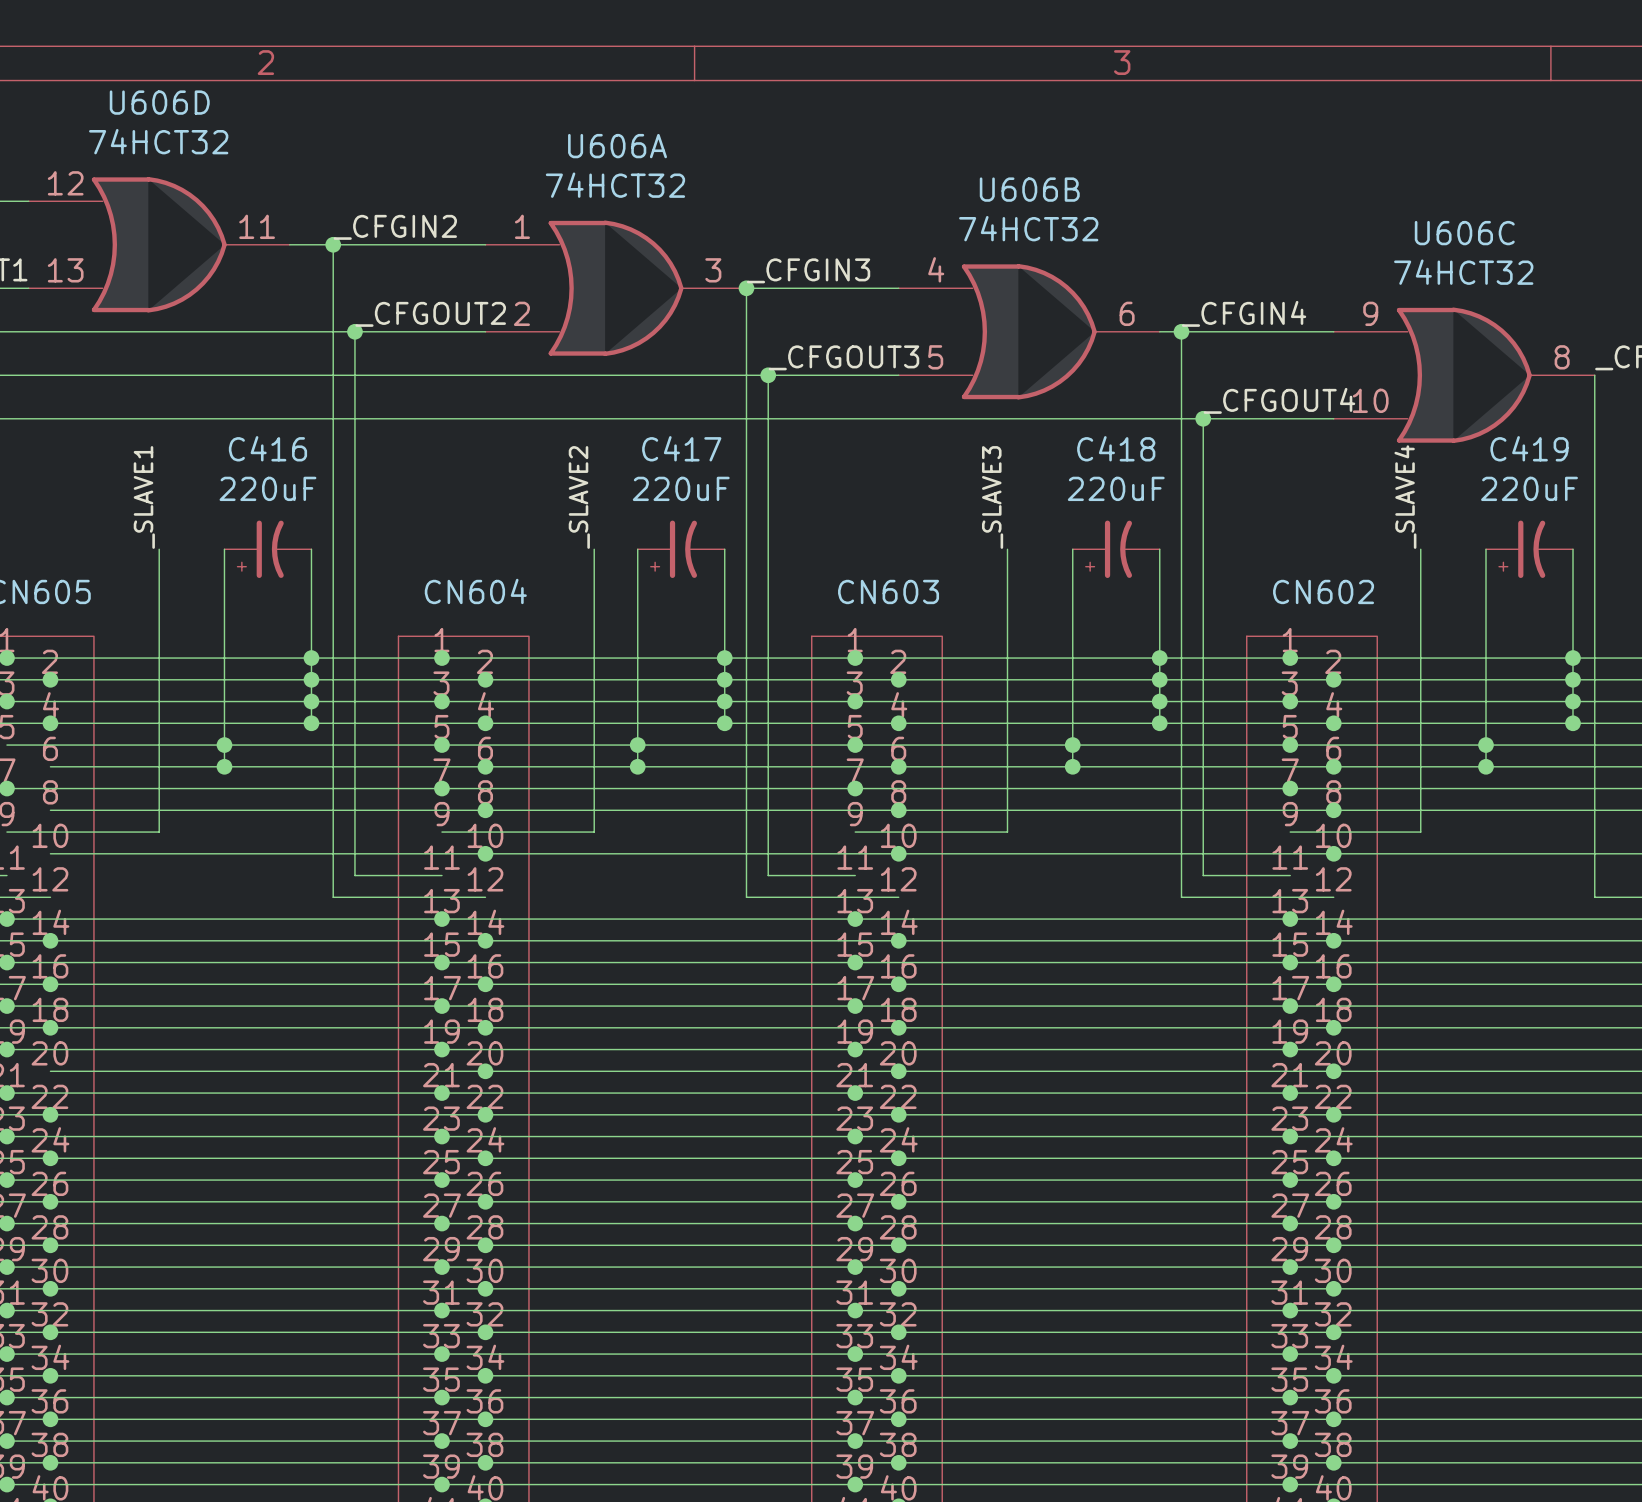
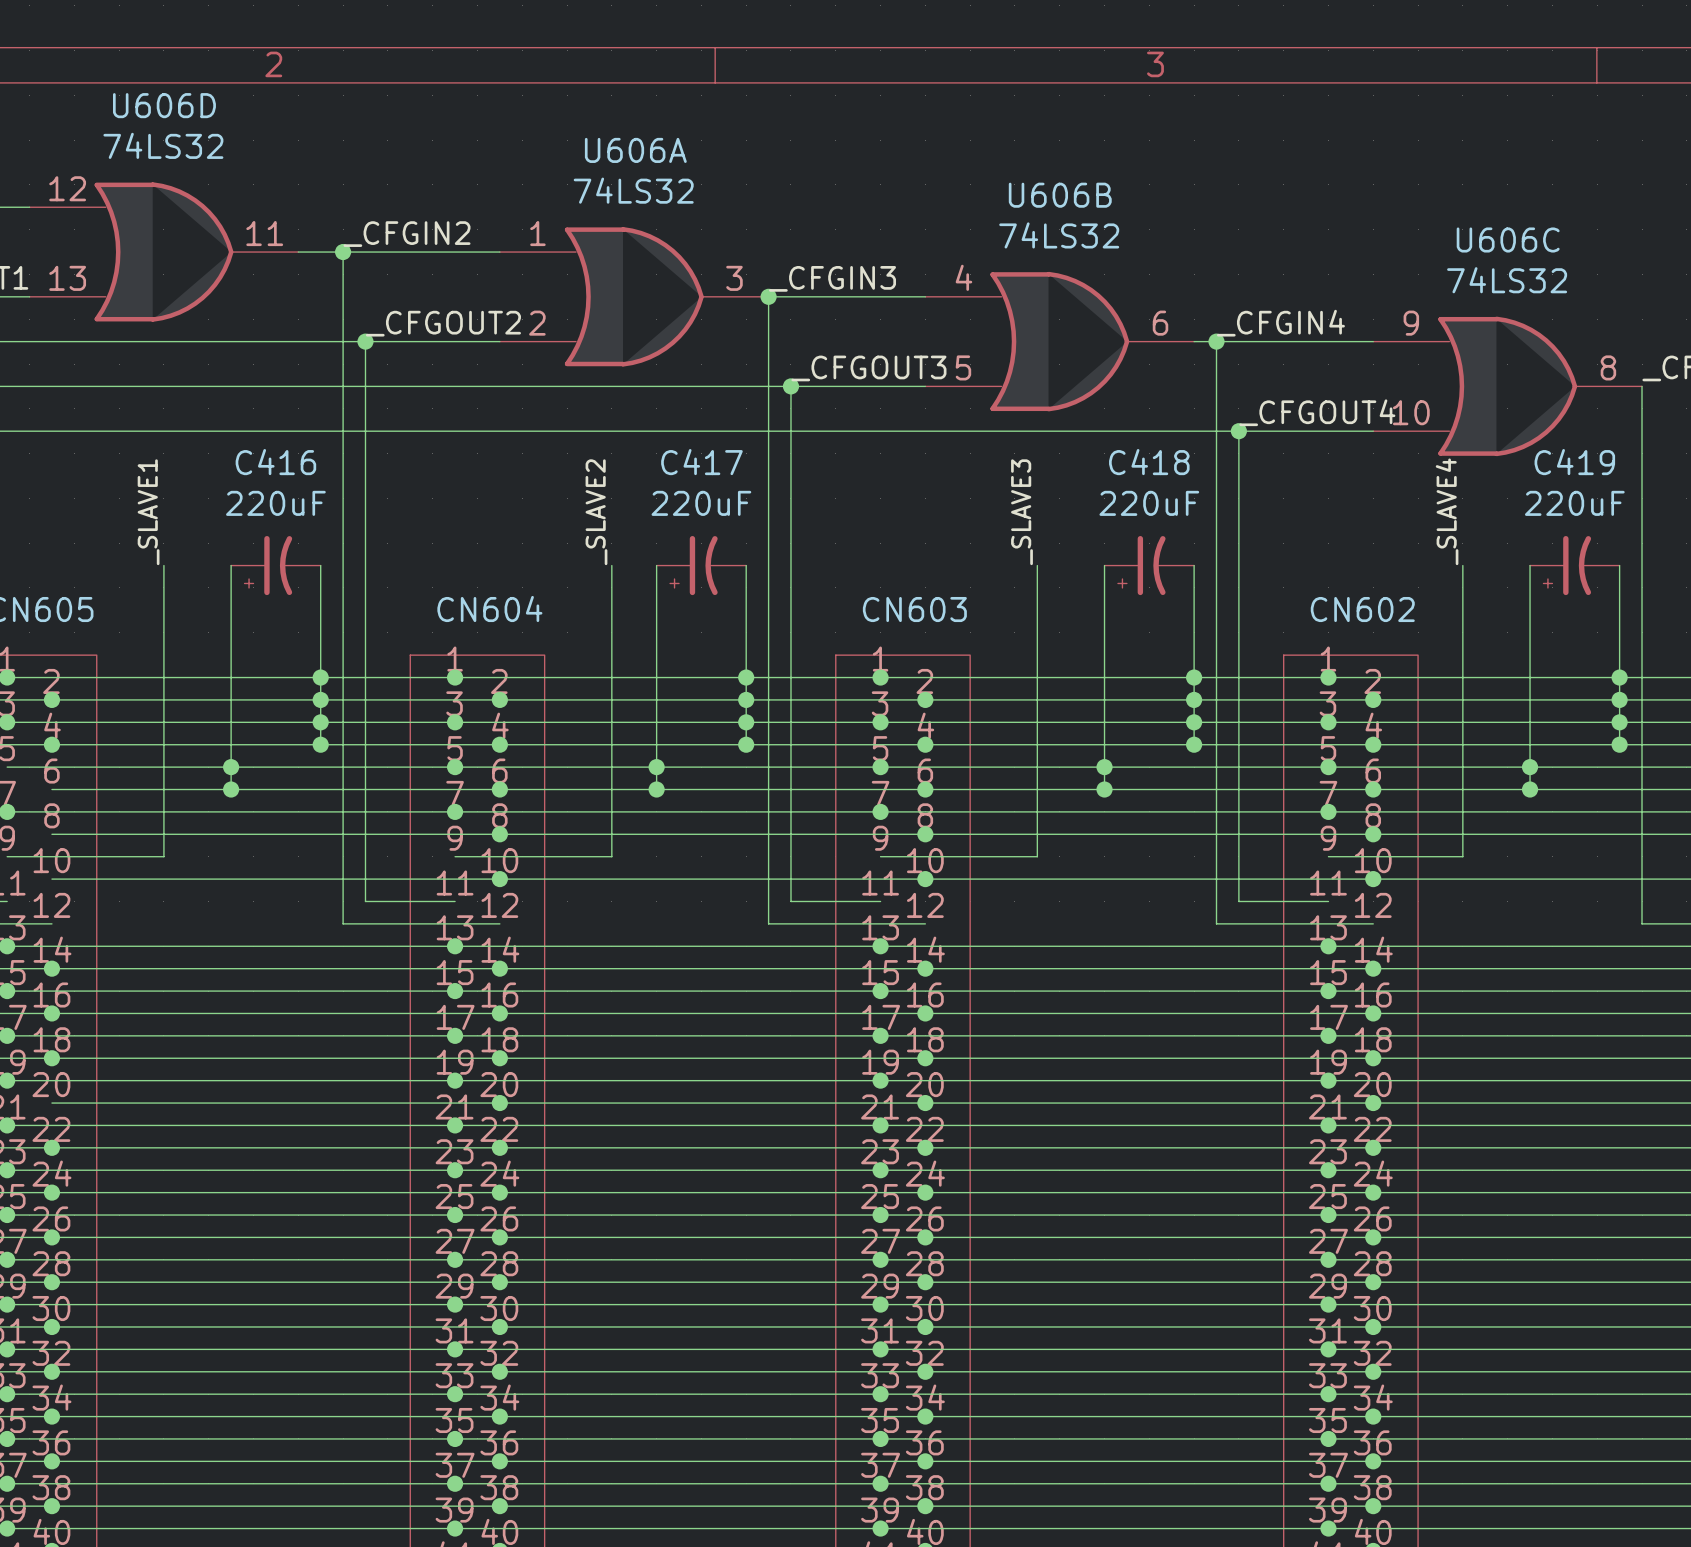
U606D value: 74HCT32 (158, 141) -> 74LS32 (163, 145)
U606A value: 74HCT32 (615, 185) -> 74LS32 (633, 190)
U606B value: 74HCT32 (1028, 228) -> 74LS32 (1059, 235)
U606C value: 74HCT32 (1463, 272) -> 74LS32 (1507, 280)

